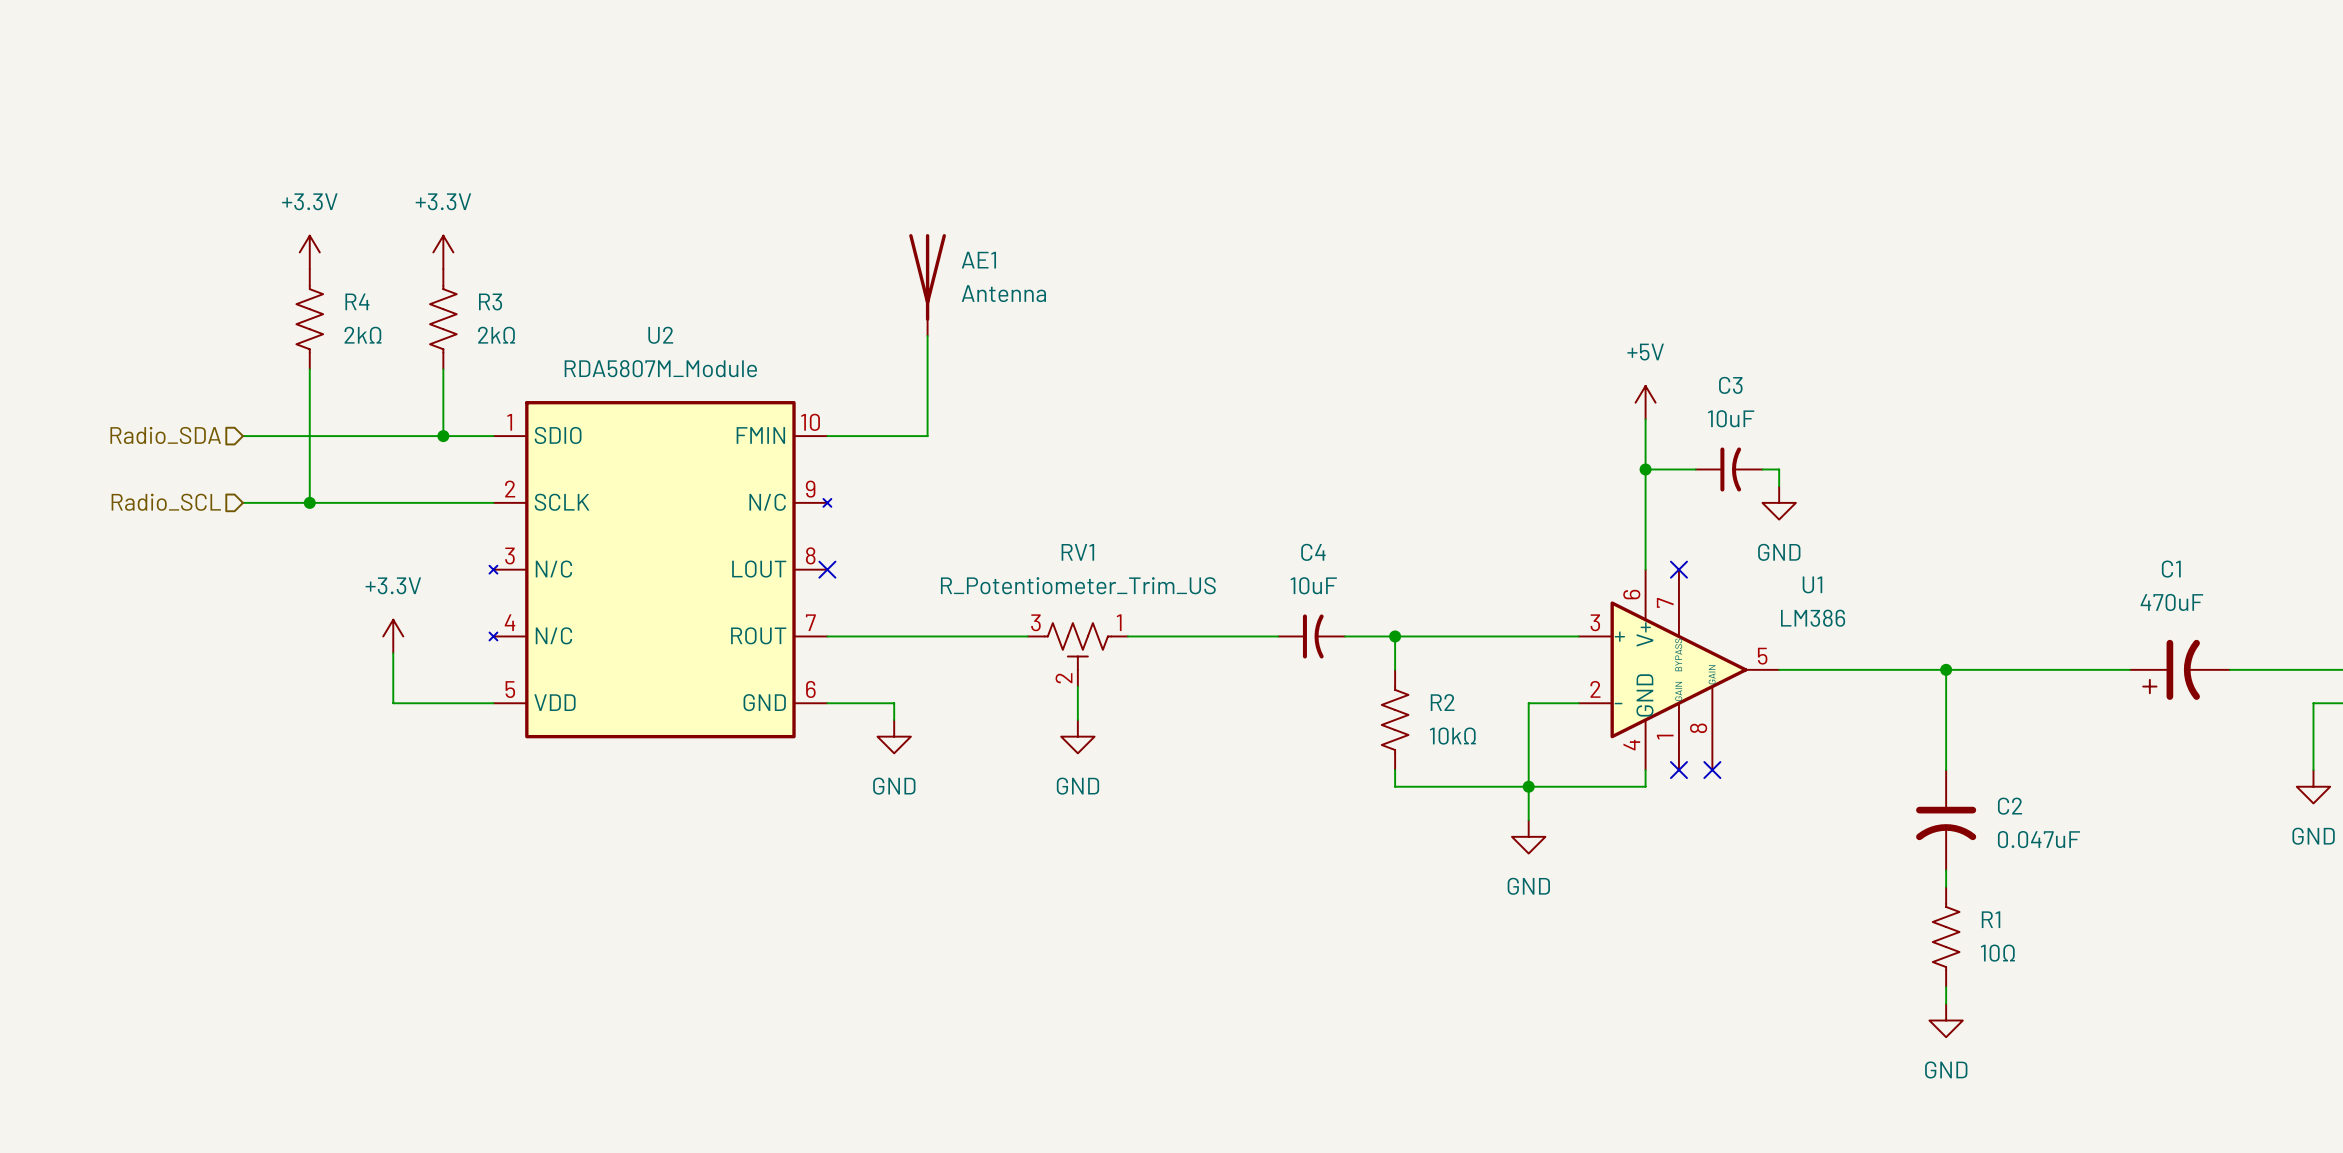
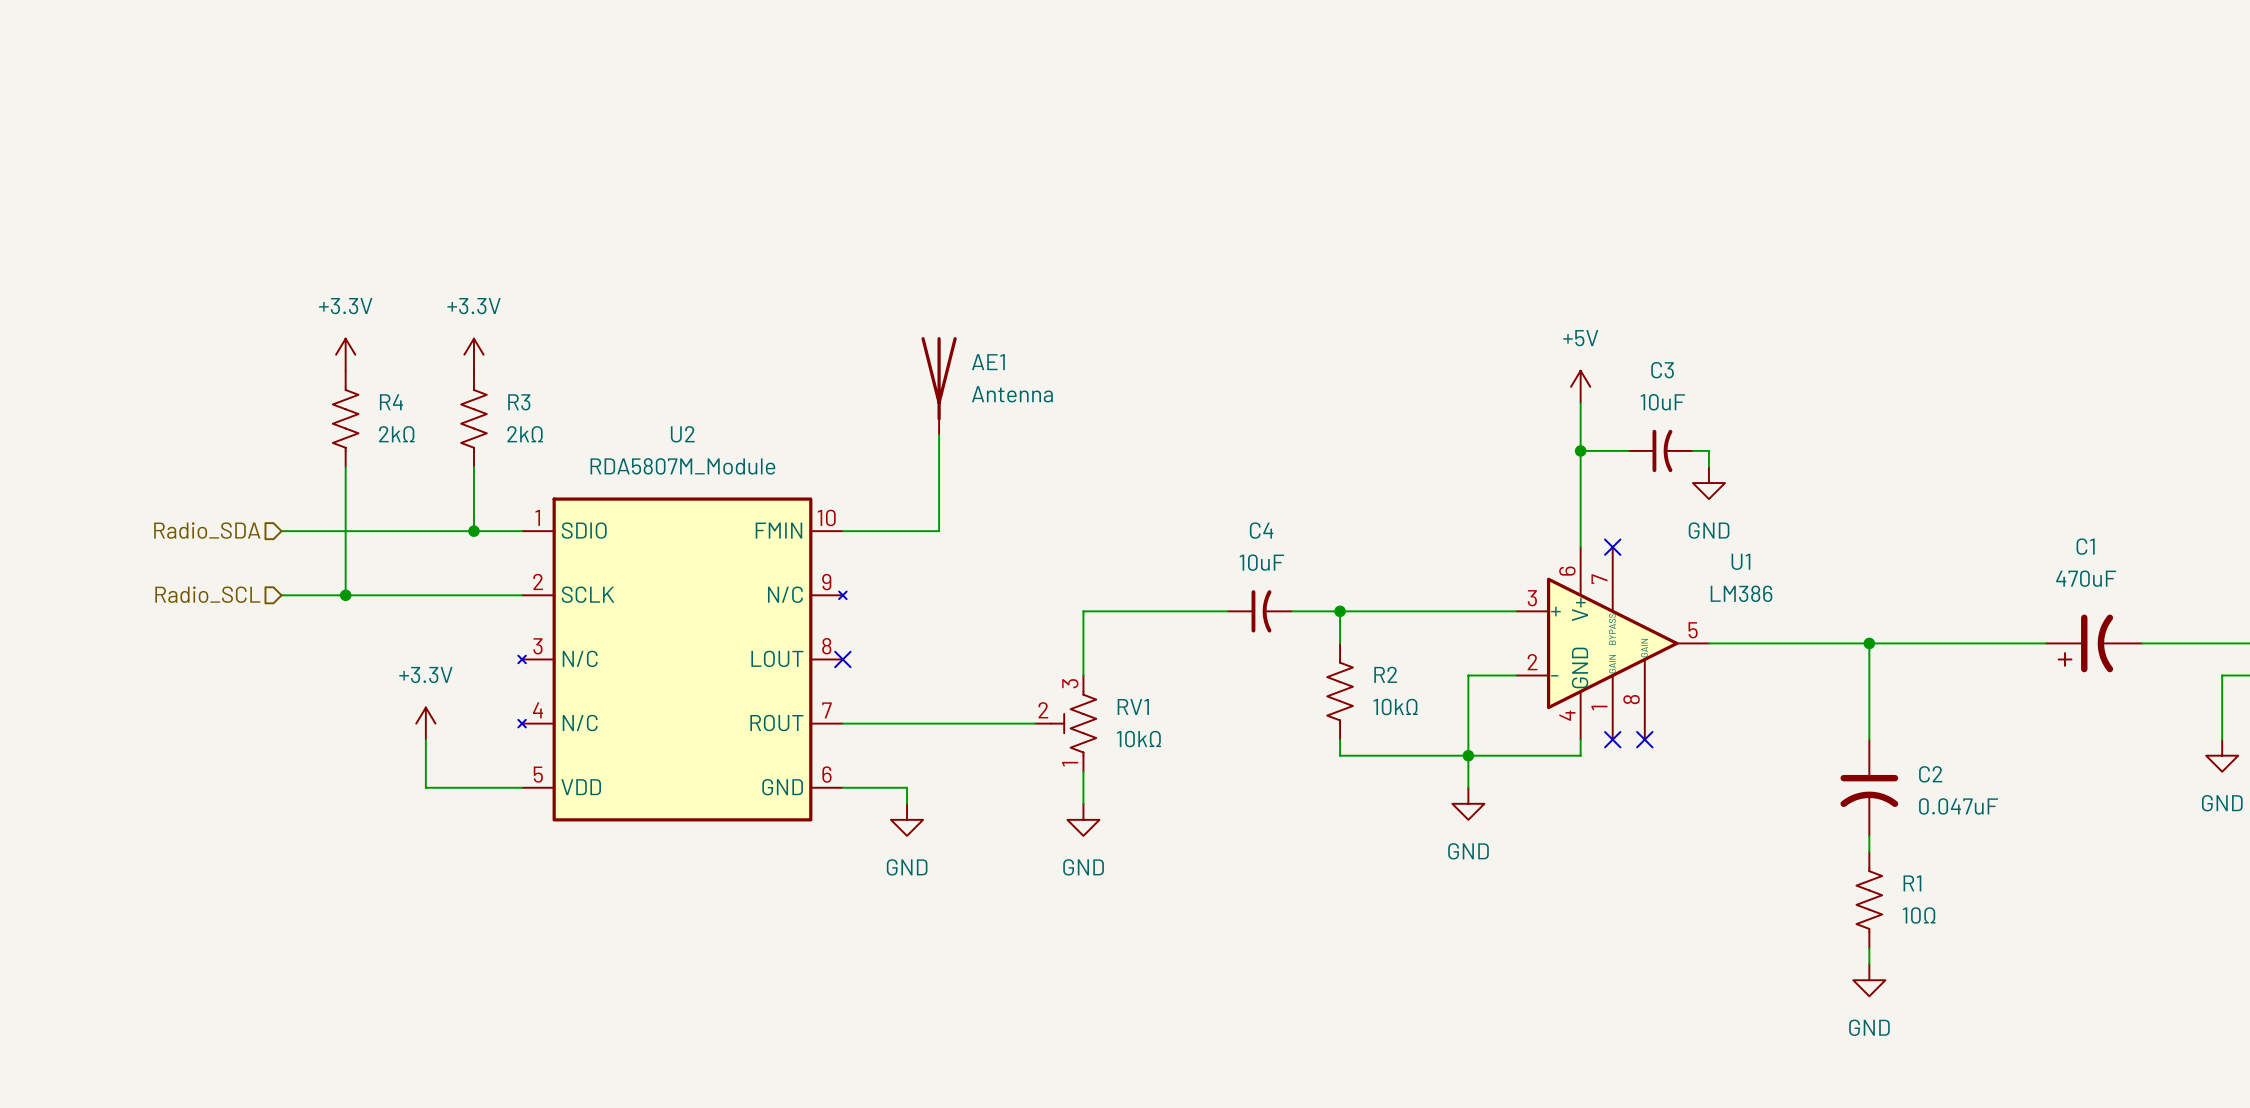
power symbol: +3.3V (309, 252) -> none
power symbol: +3.3V (443, 252) -> none
AE1 position: (927, 284) -> (939, 386)
R4 position: (309, 319) -> (345, 418)
R3 position: (443, 319) -> (473, 418)
wire: (927, 335) (927, 436) (827, 436) -> (939, 434) (939, 531) (842, 531)
wire: (309, 369) (309, 502) -> (345, 467) (345, 595)
power symbol: none -> +3.3V (345, 354)
wire: (443, 369) (443, 436) -> (473, 467) (473, 531)
power symbol: none -> +3.3V (473, 354)
hierarchical label position: Radio_SDA (165, 435) -> Radio_SDA (207, 530)
wire: (242, 436) (493, 436) -> (281, 531) (522, 531)
junction: (443, 436) -> none
hierarchical label position: Radio_SCL (166, 502) -> Radio_SCL (207, 594)
wire: (242, 502) (493, 502) -> (281, 595) (522, 595)
junction: (309, 502) -> none
junction: none -> (473, 531)
RV1 name position: RV1 (1077, 552) -> RV1 (1133, 706)
U2 position: (660, 569) -> (682, 659)
no-connect mark: (827, 569) -> none
RV1 value: R_Potentiometer_Trim_US (1078, 585) -> 10kΩ (1138, 739)
junction: none -> (345, 595)
power symbol position: +3.3V (393, 636) -> +3.3V (425, 723)
wire: (827, 636) (1027, 636) -> (842, 723) (1035, 723)
wire: none -> (1083, 611) (1083, 675)
RV1 rotation: 0° (1077, 646) -> 90° clockwise (1073, 723)
wire: (393, 653) (393, 703) (493, 703) -> (425, 739) (425, 787) (522, 787)
RV1 position: (1077, 654) -> (1065, 723)
no-connect mark: none -> (842, 659)
wire: (1077, 686) (1077, 719) -> (1083, 771) (1083, 803)
wire: (827, 703) (894, 703) (894, 719) -> (842, 787) (907, 787) (907, 803)
power symbol: GND (894, 736) -> none
power symbol: GND (1077, 736) -> none
power symbol: none -> GND (907, 819)
power symbol: none -> GND (1083, 819)

